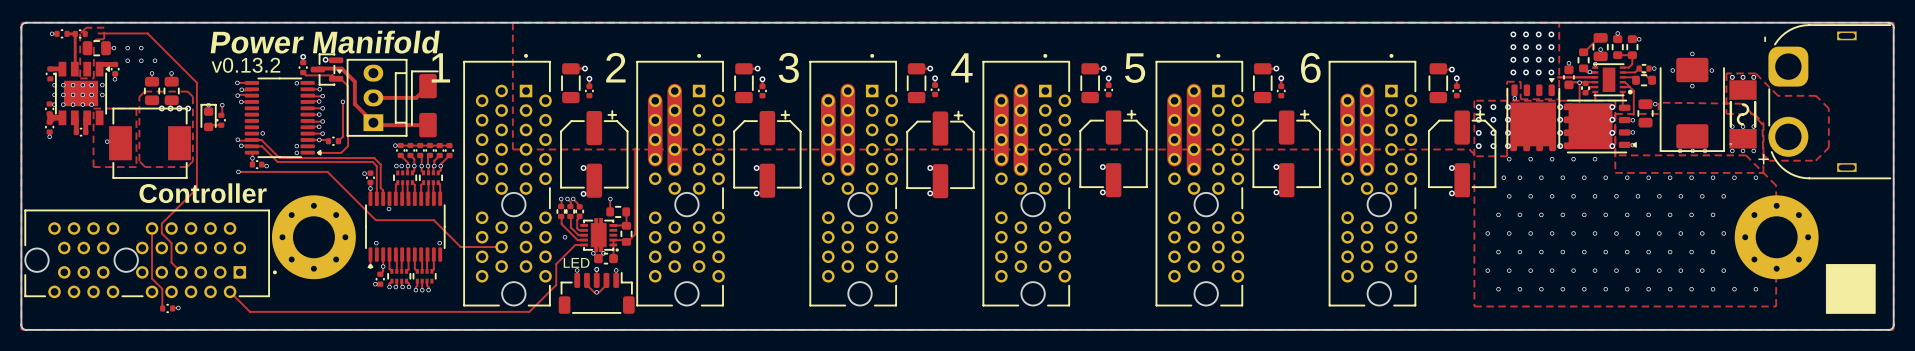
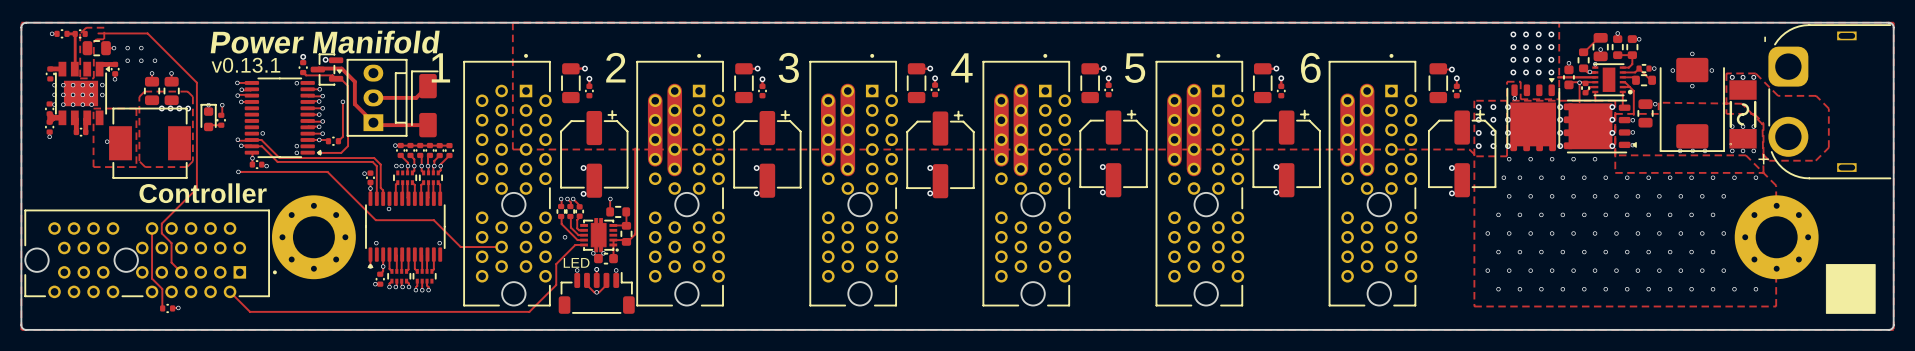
text: v0.13.2 (245, 65) -> v0.13.1 (245, 65)

